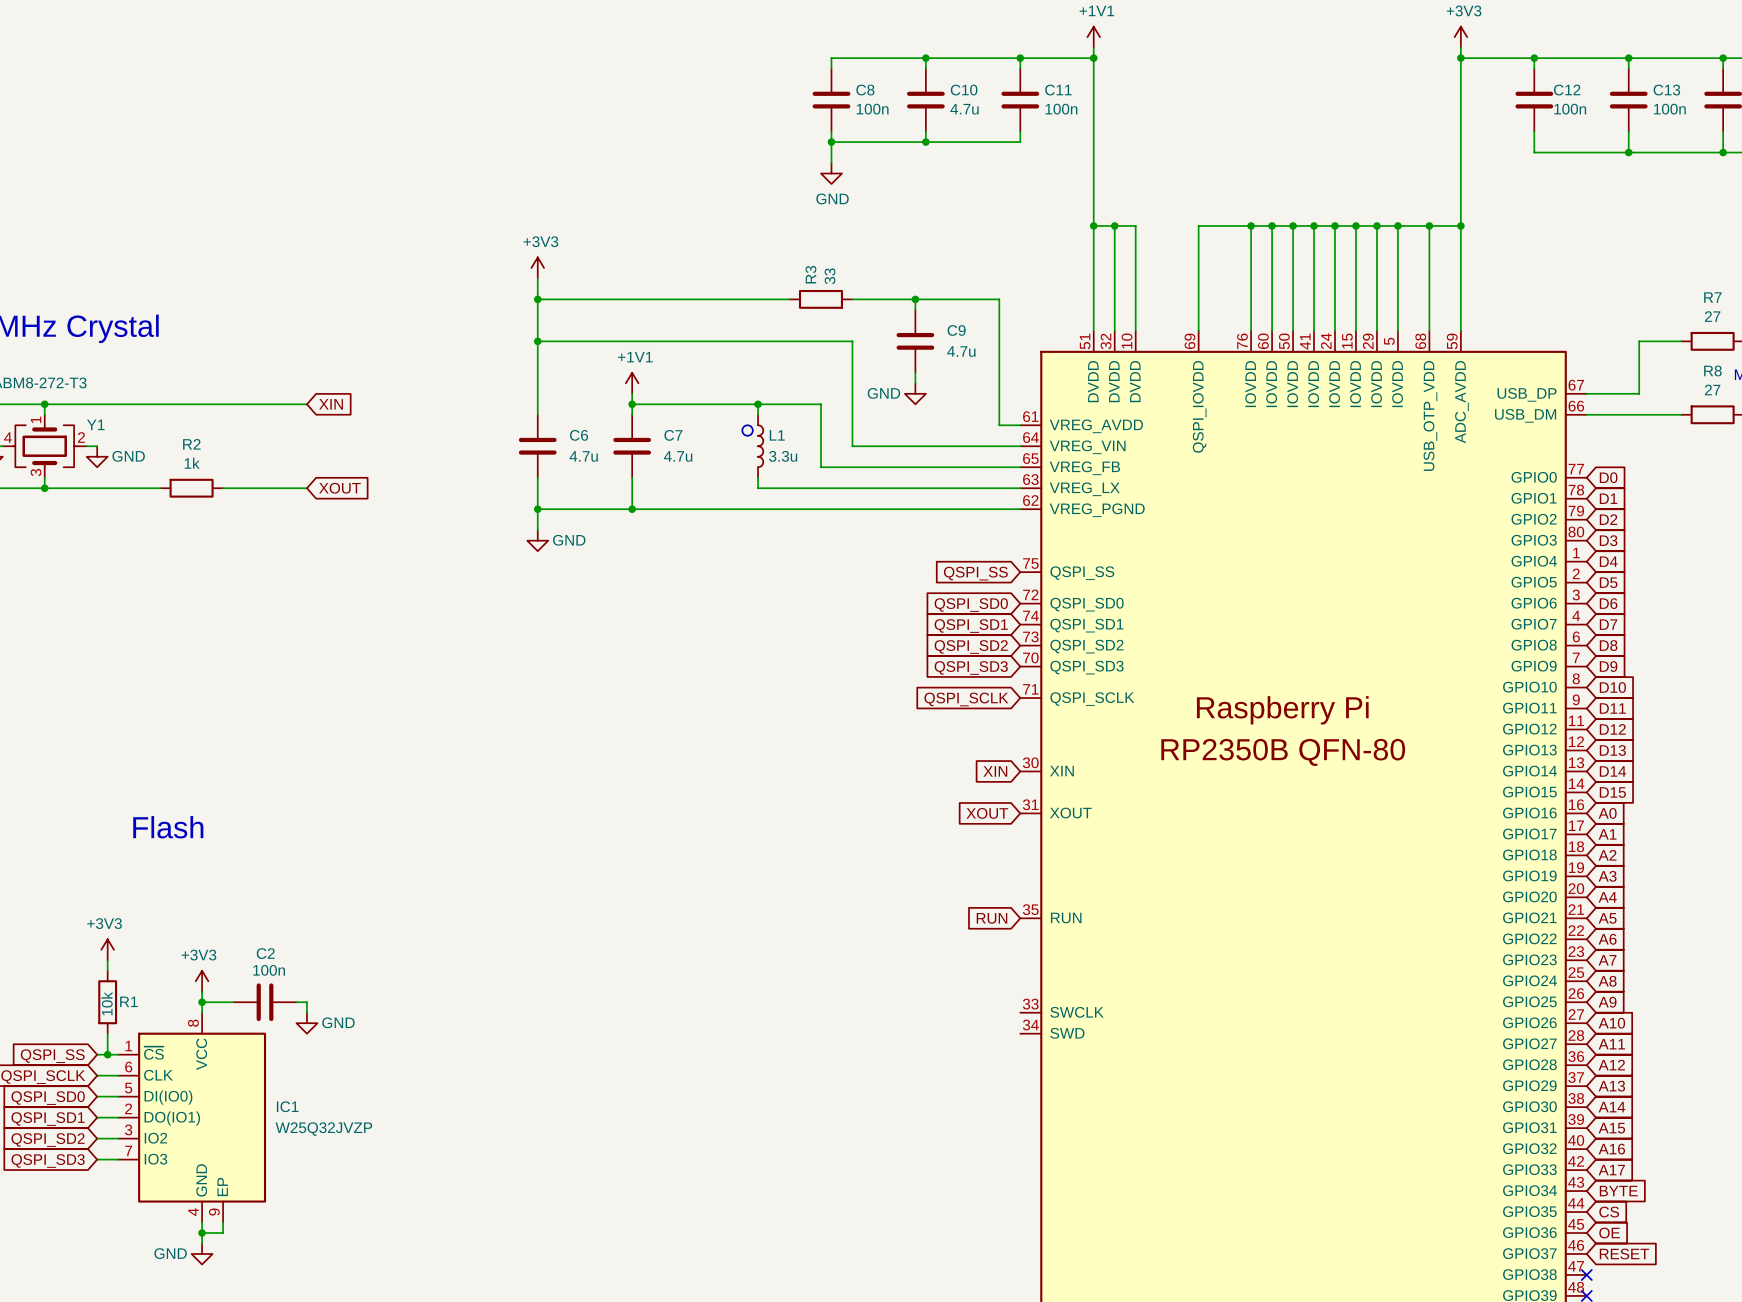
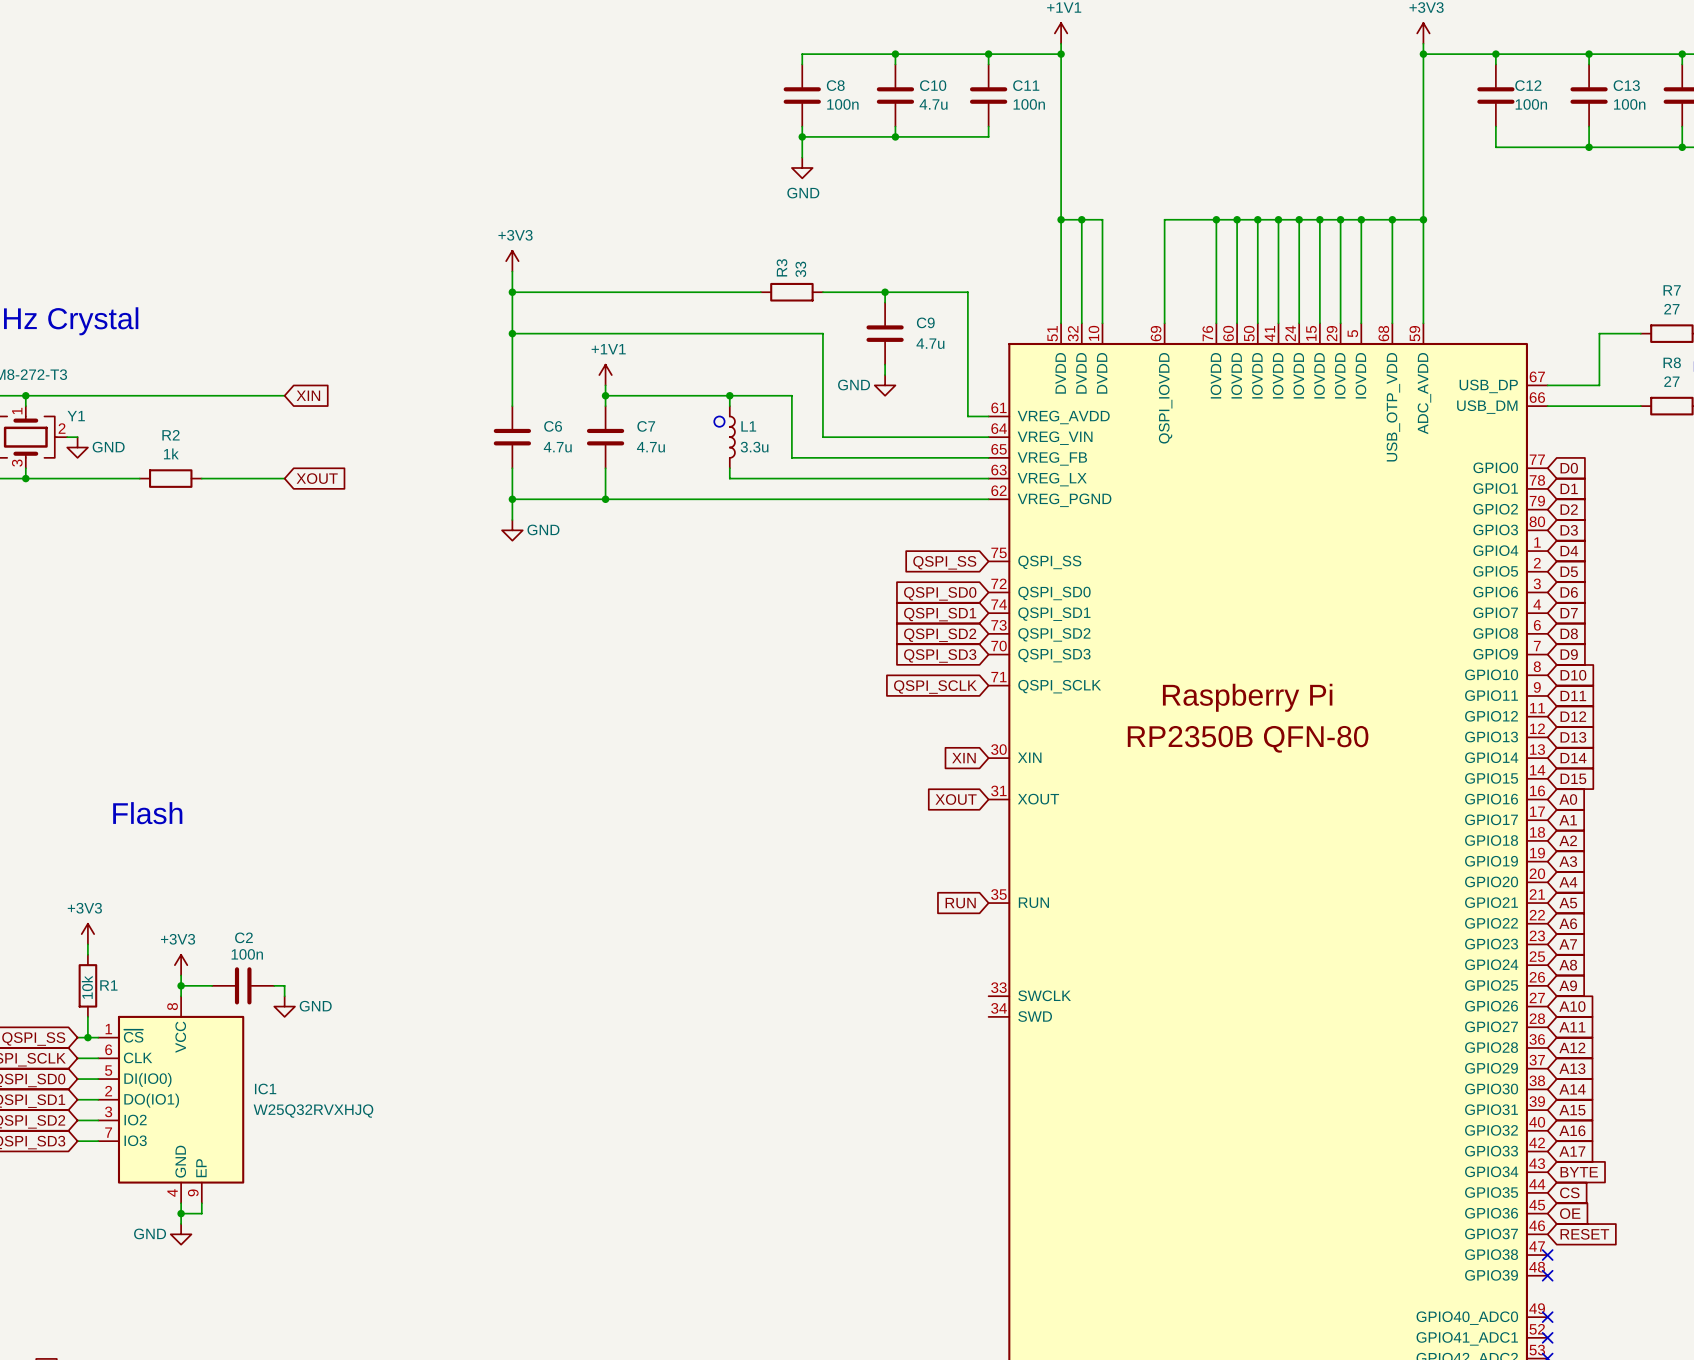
IC1 value: W25Q32JVZP (323, 1129) -> W25Q32RVXHJQ (313, 1111)

